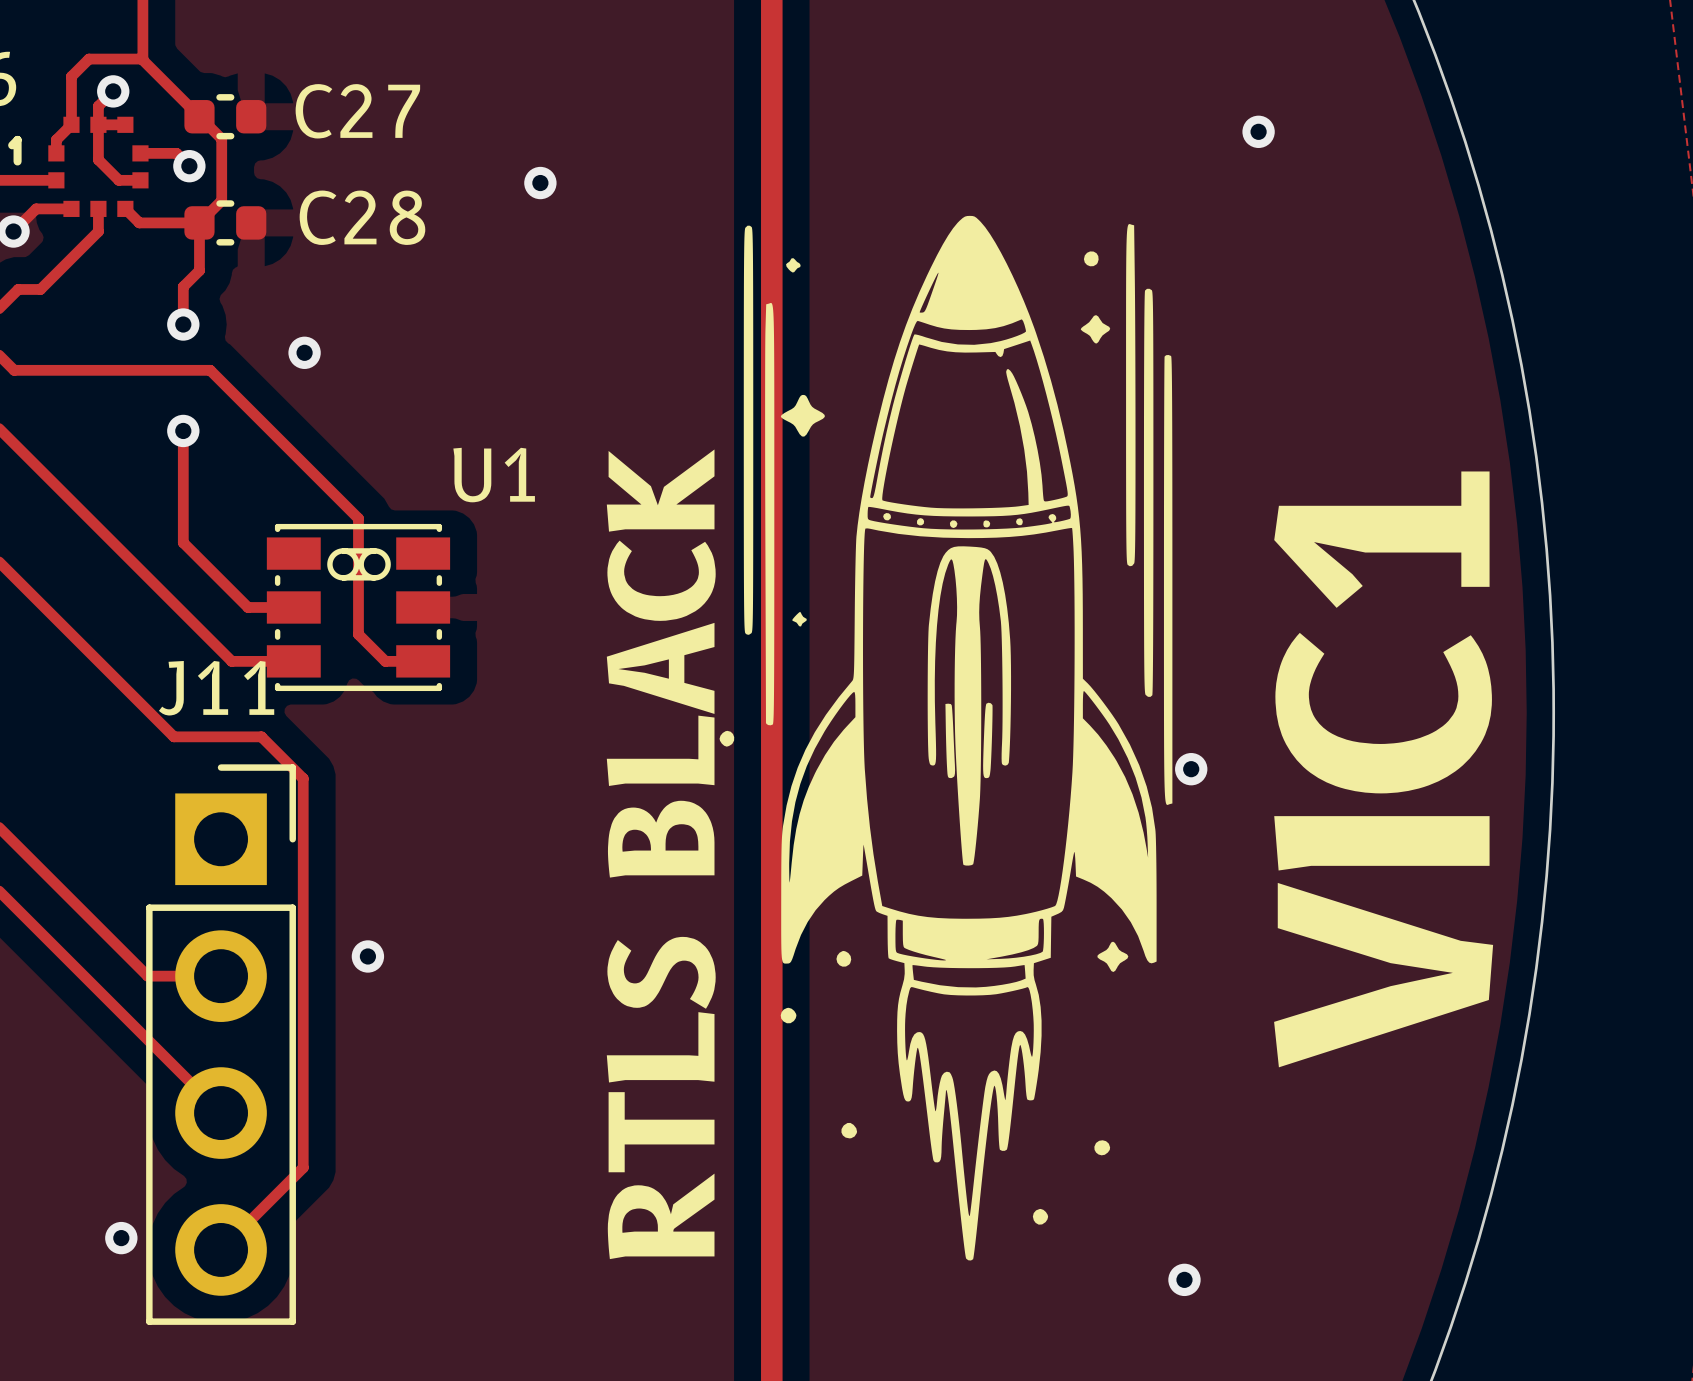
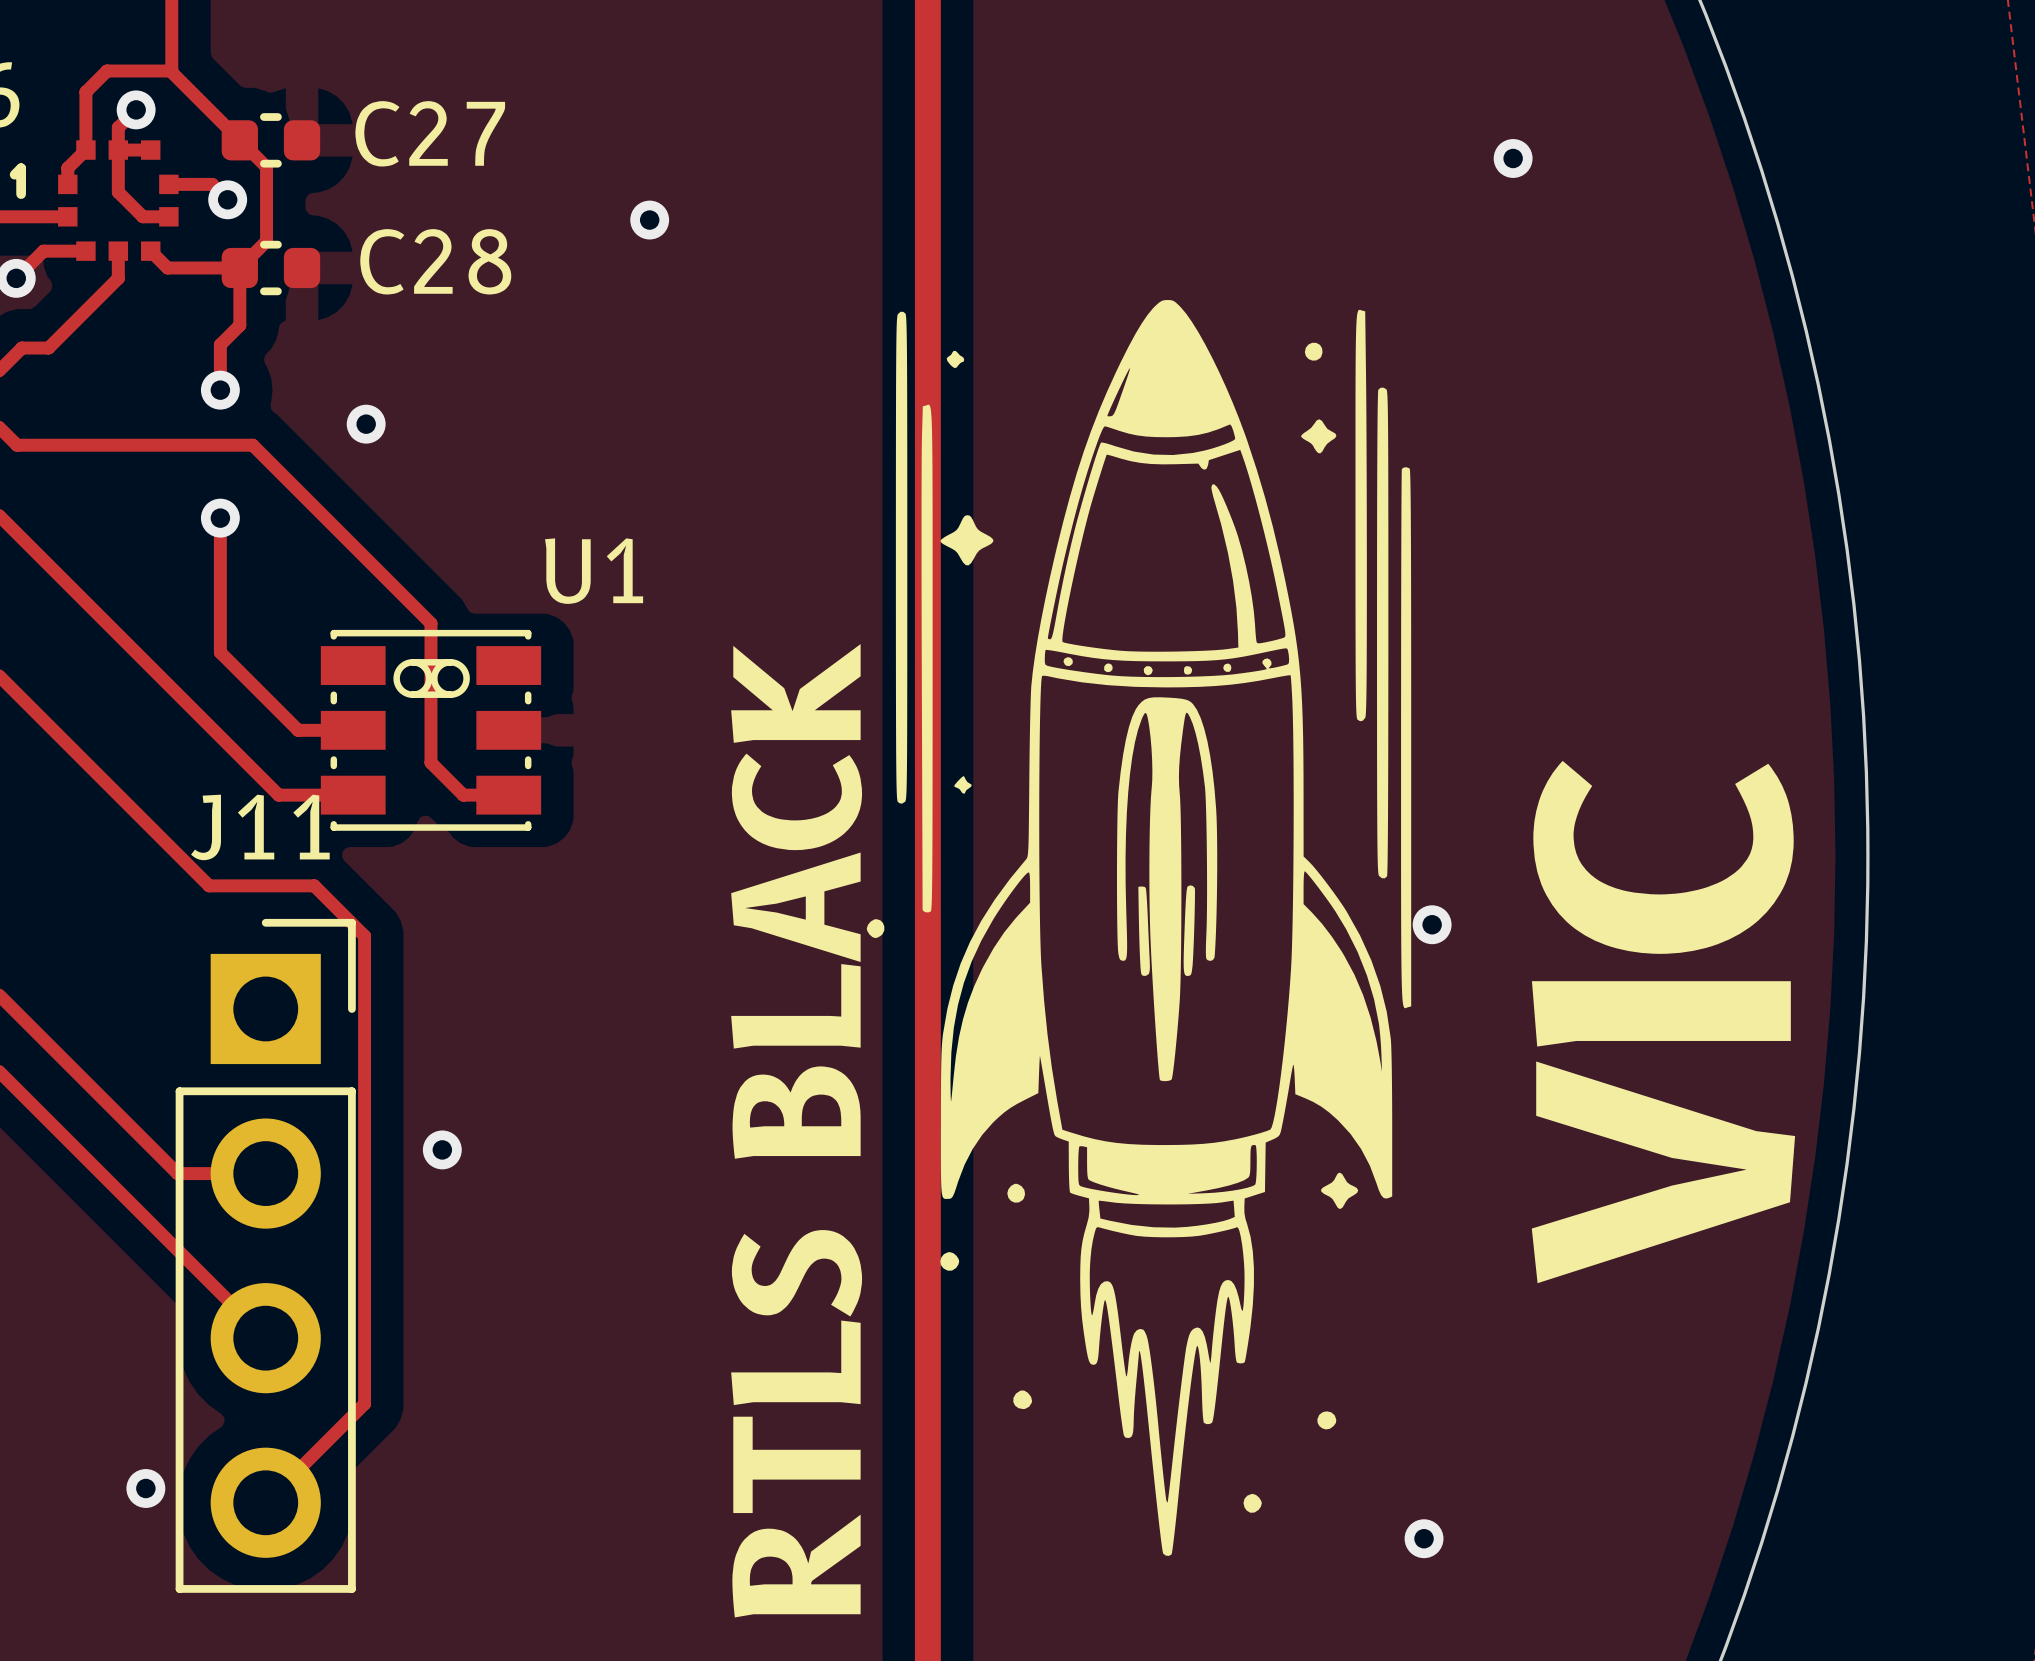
drawing position: (945, 738) -> (1138, 927)
text: VIC1 (1383, 769) -> VIC (1663, 1022)
text position: RTLS BLACK (661, 854) -> RTLS BLACK (796, 1130)

